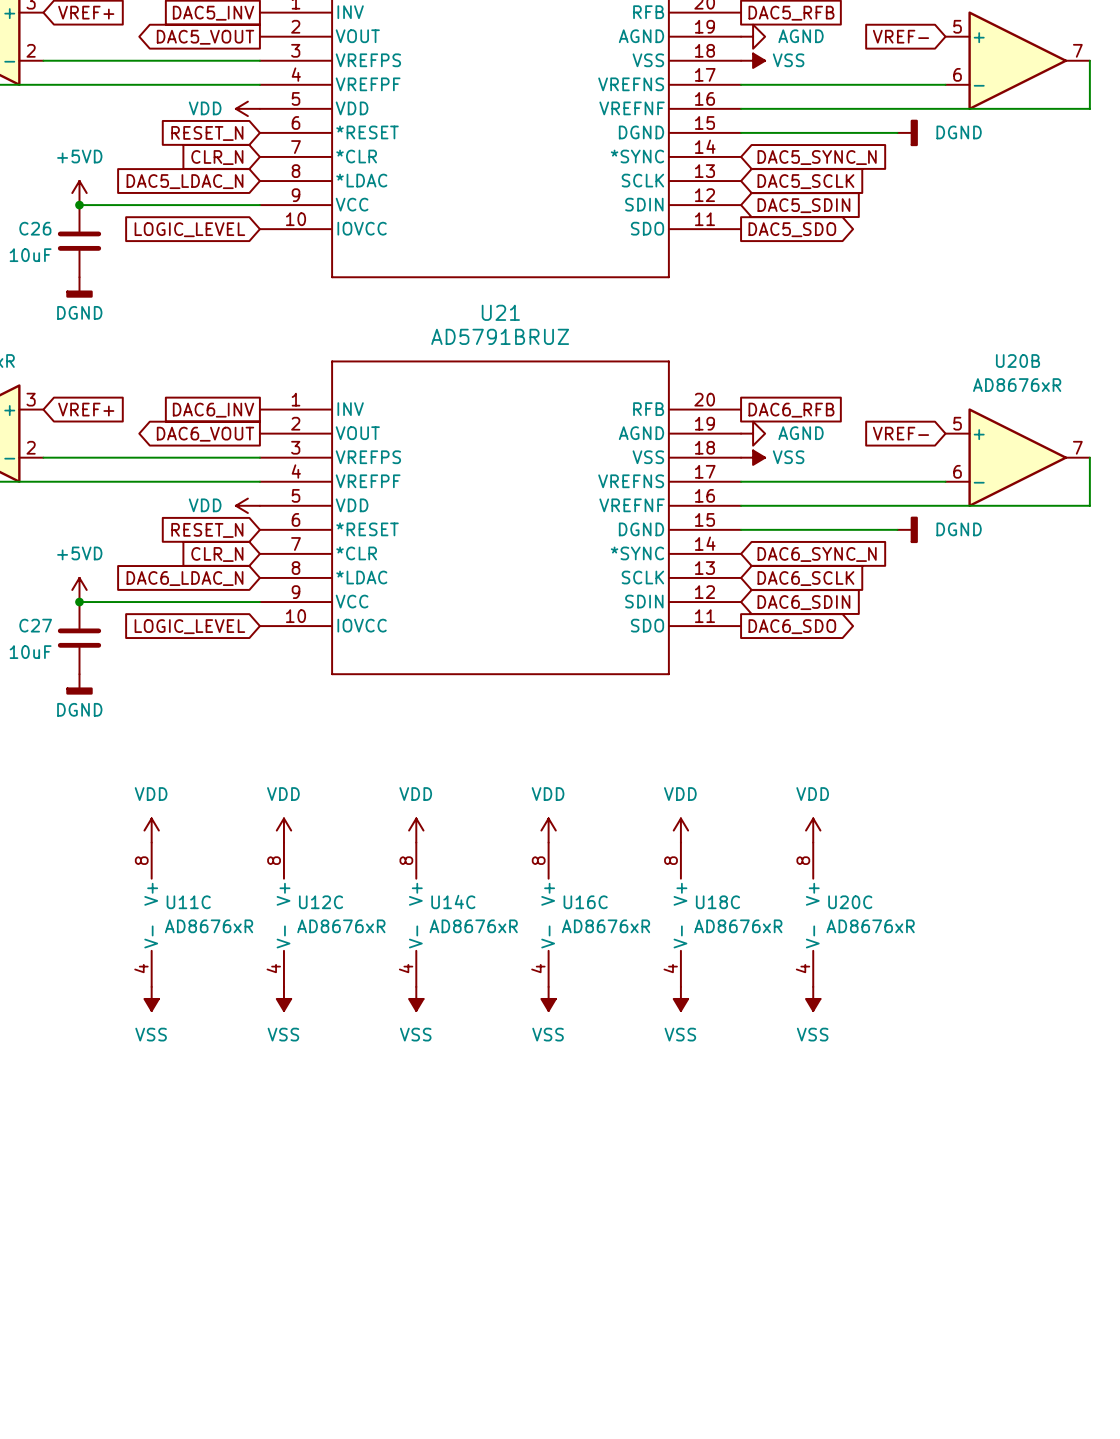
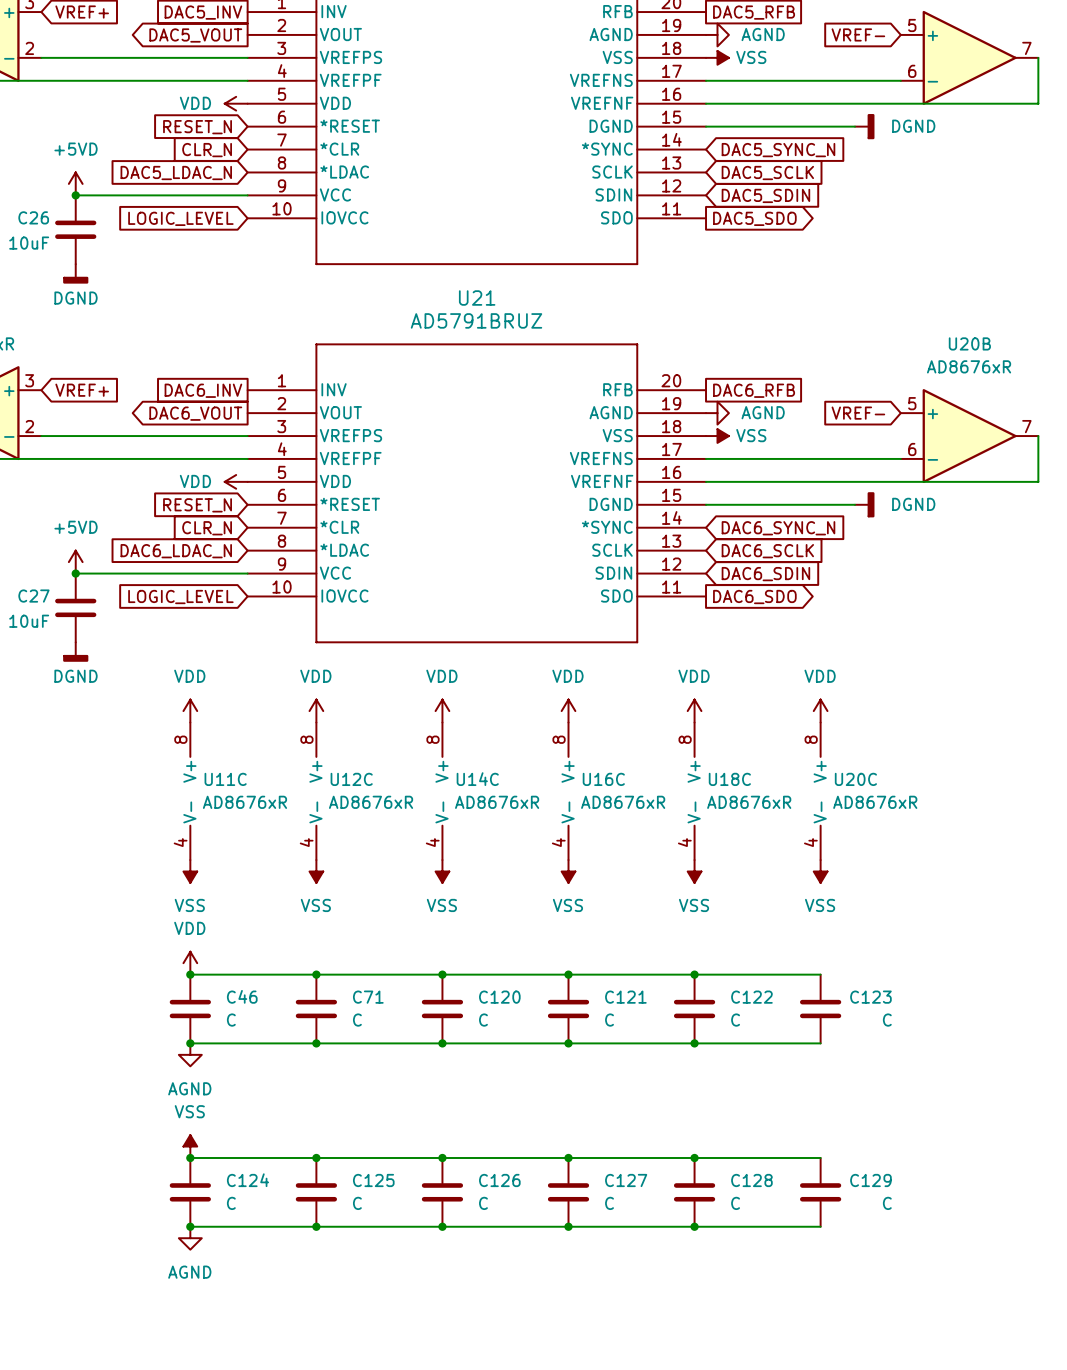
power symbol: none -> VDD (190, 711)
power symbol: none -> VDD (316, 711)
power symbol: none -> VDD (442, 711)
power symbol: none -> VDD (568, 711)
power symbol: none -> VDD (694, 711)
power symbol: none -> VDD (820, 711)
power symbol: VDD (151, 830) -> none
power symbol: VDD (283, 830) -> none
power symbol: VDD (416, 830) -> none
power symbol: VDD (548, 830) -> none
power symbol: VDD (680, 830) -> none
power symbol: VDD (813, 830) -> none
U11C position: (151, 914) -> (190, 791)
power symbol: none -> VSS (190, 871)
U12C position: (283, 914) -> (316, 791)
power symbol: none -> VSS (316, 871)
U14C position: (416, 914) -> (442, 791)
power symbol: none -> VSS (442, 871)
U16C position: (548, 914) -> (568, 791)
power symbol: none -> VSS (568, 871)
U18C position: (680, 914) -> (694, 791)
power symbol: none -> VSS (694, 871)
U20C position: (813, 914) -> (820, 791)
power symbol: none -> VSS (820, 871)
power symbol: VSS (151, 998) -> none
power symbol: VSS (283, 998) -> none
power symbol: VSS (416, 998) -> none
power symbol: VSS (548, 998) -> none
power symbol: VSS (680, 998) -> none
power symbol: VSS (813, 998) -> none
power symbol: none -> VDD (190, 963)
wire: none -> (190, 974) (820, 974)
junction: none -> (190, 974)
junction: none -> (316, 974)
junction: none -> (442, 974)
junction: none -> (568, 974)
junction: none -> (694, 974)
C46: none -> C (190, 1009)
C71: none -> C (316, 1009)
C120: none -> C (442, 1009)
C121: none -> C (568, 1009)
C122: none -> C (694, 1009)
C123: none -> C (820, 1009)
wire: none -> (190, 1043) (820, 1043)
junction: none -> (190, 1043)
junction: none -> (316, 1043)
junction: none -> (442, 1043)
junction: none -> (568, 1043)
junction: none -> (694, 1043)
power symbol: none -> AGND (190, 1054)
power symbol: none -> VSS (190, 1146)
wire: none -> (190, 1157) (820, 1157)
junction: none -> (190, 1157)
junction: none -> (316, 1157)
junction: none -> (442, 1157)
junction: none -> (568, 1157)
junction: none -> (694, 1157)
C124: none -> C (190, 1192)
C125: none -> C (316, 1192)
C126: none -> C (442, 1192)
C127: none -> C (568, 1192)
C128: none -> C (694, 1192)
C129: none -> C (820, 1192)
wire: none -> (190, 1226) (820, 1226)
junction: none -> (190, 1226)
junction: none -> (316, 1226)
junction: none -> (442, 1226)
junction: none -> (568, 1226)
junction: none -> (694, 1226)
power symbol: none -> AGND (190, 1238)

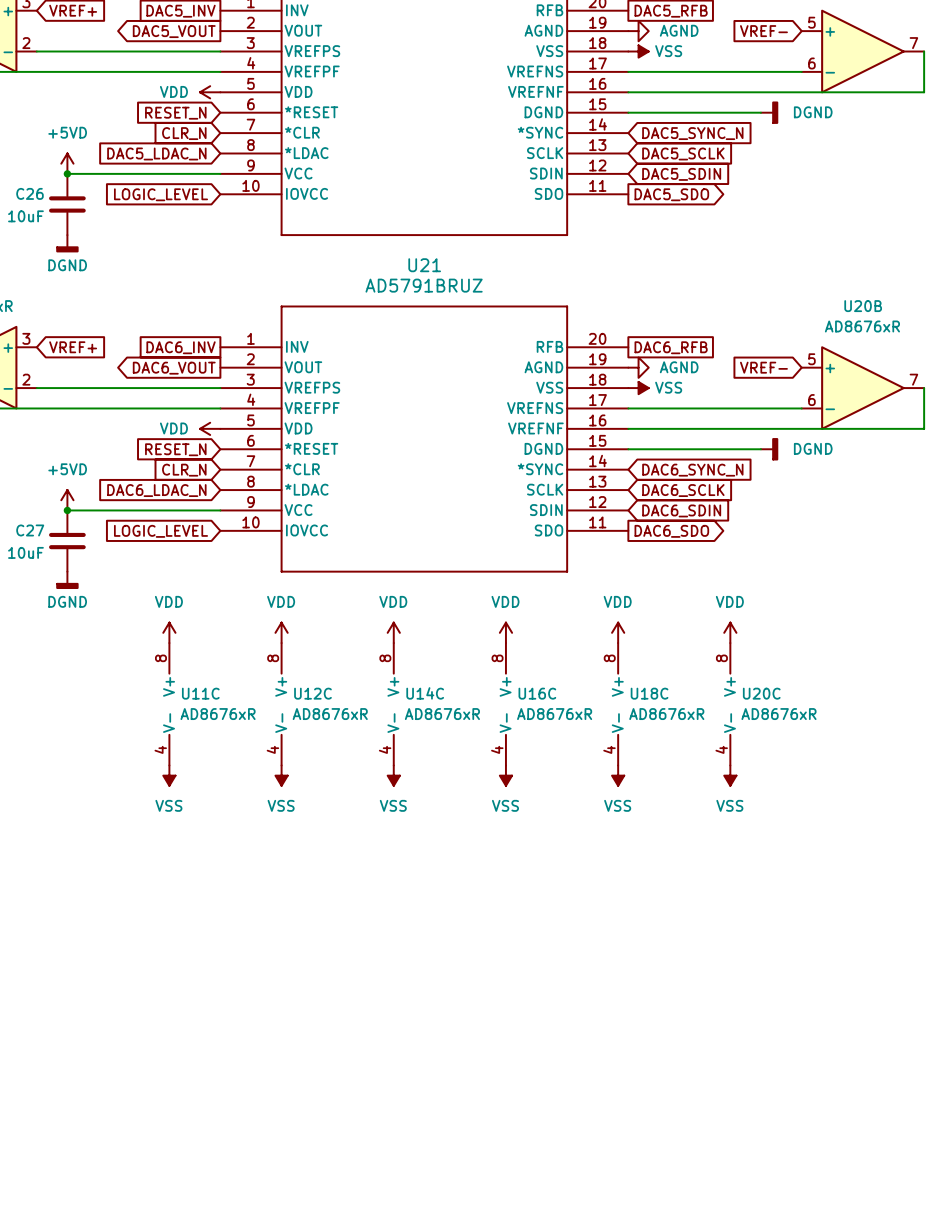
power symbol: VDD (190, 963) -> none
wire: (190, 974) (820, 974) -> none
junction: (190, 974) -> none
junction: (316, 974) -> none
junction: (442, 974) -> none
junction: (568, 974) -> none
junction: (694, 974) -> none
C46: C (190, 1009) -> none
C71: C (316, 1009) -> none
C120: C (442, 1009) -> none
C121: C (568, 1009) -> none
C122: C (694, 1009) -> none
C123: C (820, 1009) -> none
wire: (190, 1043) (820, 1043) -> none
junction: (190, 1043) -> none
junction: (316, 1043) -> none
junction: (442, 1043) -> none
junction: (568, 1043) -> none
junction: (694, 1043) -> none
power symbol: AGND (190, 1054) -> none
power symbol: VSS (190, 1146) -> none
wire: (190, 1157) (820, 1157) -> none
junction: (190, 1157) -> none
junction: (316, 1157) -> none
junction: (442, 1157) -> none
junction: (568, 1157) -> none
junction: (694, 1157) -> none
C124: C (190, 1192) -> none
C125: C (316, 1192) -> none
C126: C (442, 1192) -> none
C127: C (568, 1192) -> none
C128: C (694, 1192) -> none
C129: C (820, 1192) -> none
wire: (190, 1226) (820, 1226) -> none
junction: (190, 1226) -> none
junction: (316, 1226) -> none
junction: (442, 1226) -> none
junction: (568, 1226) -> none
junction: (694, 1226) -> none
power symbol: AGND (190, 1238) -> none

